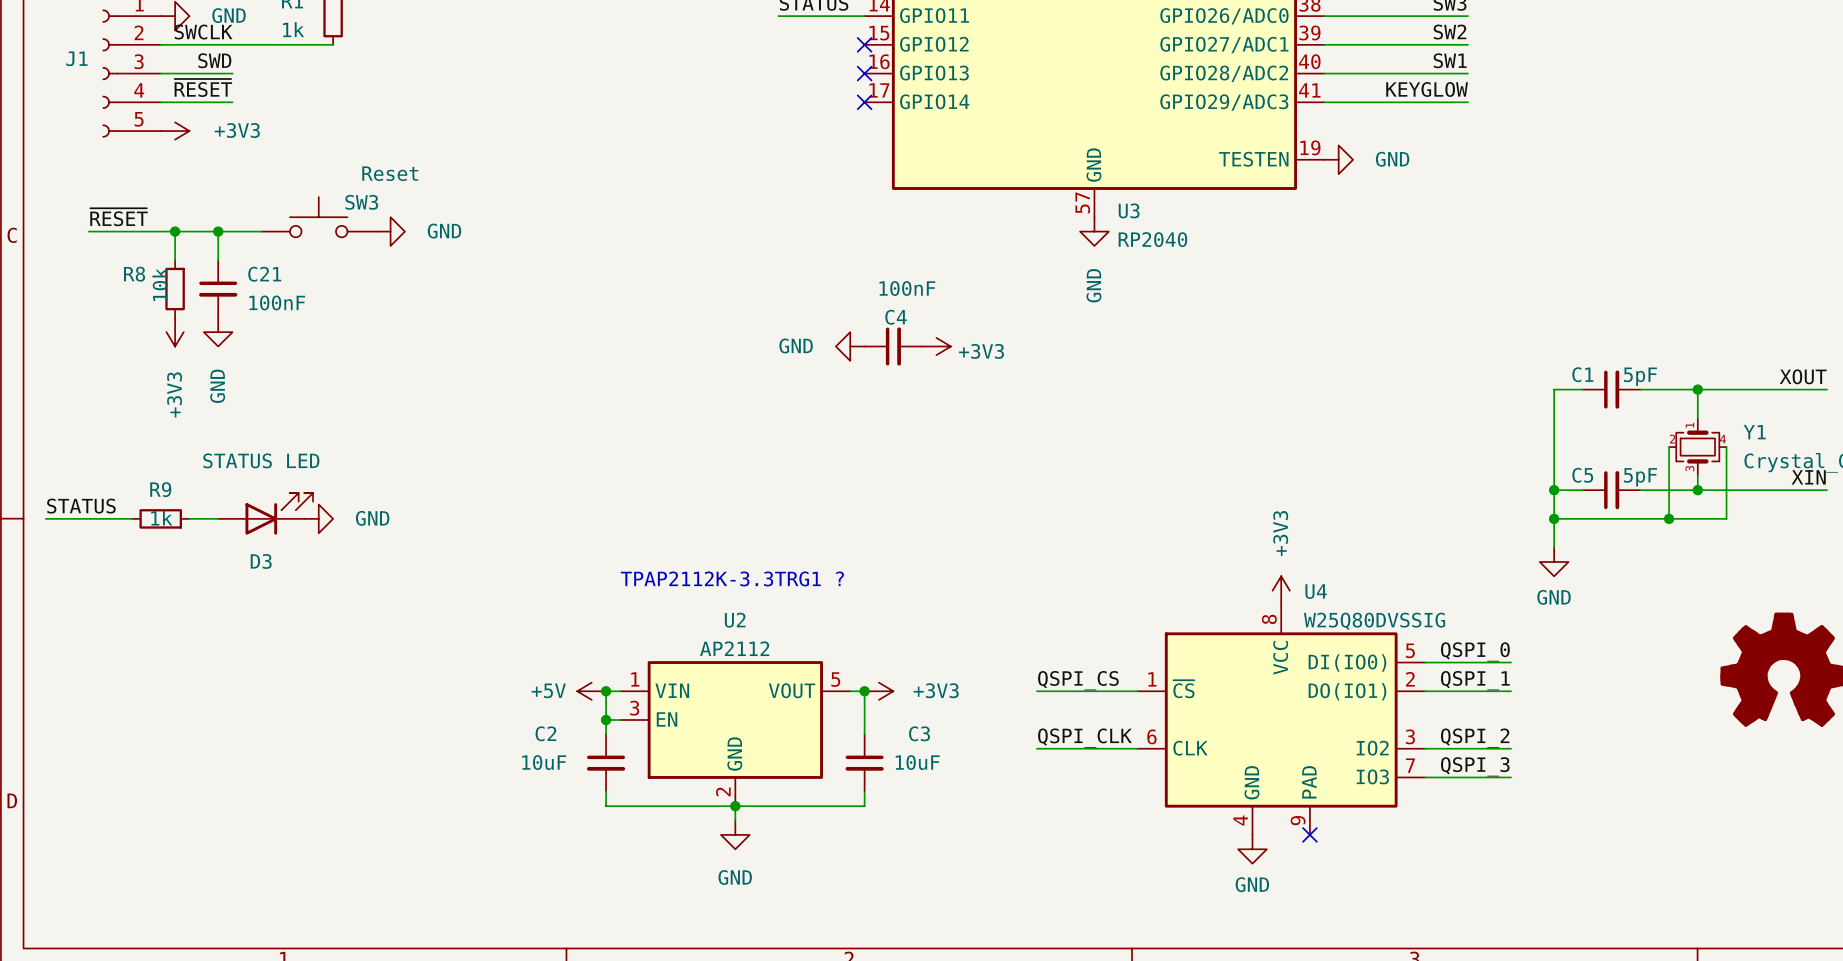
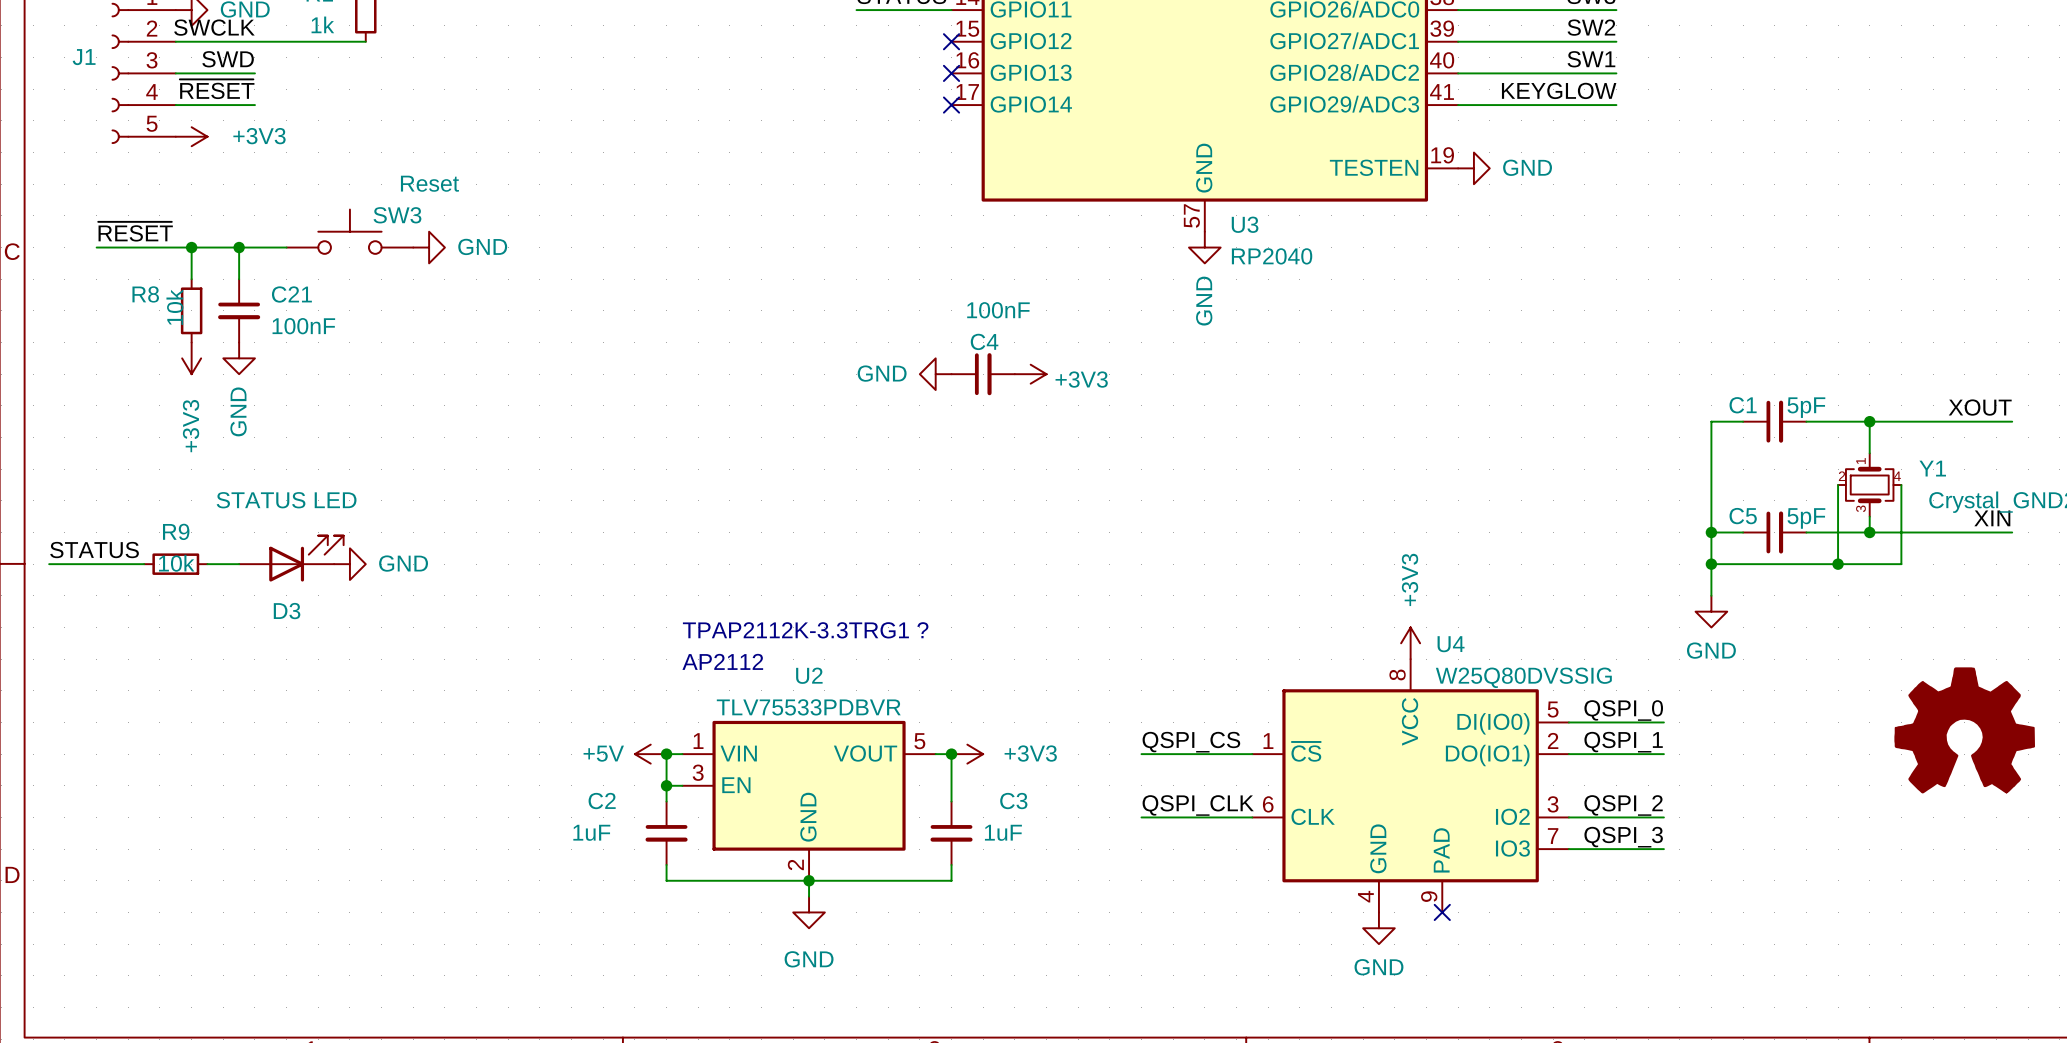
R9 value: 1k (161, 518) -> 10k (176, 563)
text: none -> AP2112 (722, 661)
U2 value: AP2112 (734, 648) -> TLV75533PDBVR (808, 707)
C2 value: 10uF (544, 762) -> 1uF (591, 832)
C3 value: 10uF (917, 762) -> 1uF (1003, 832)

